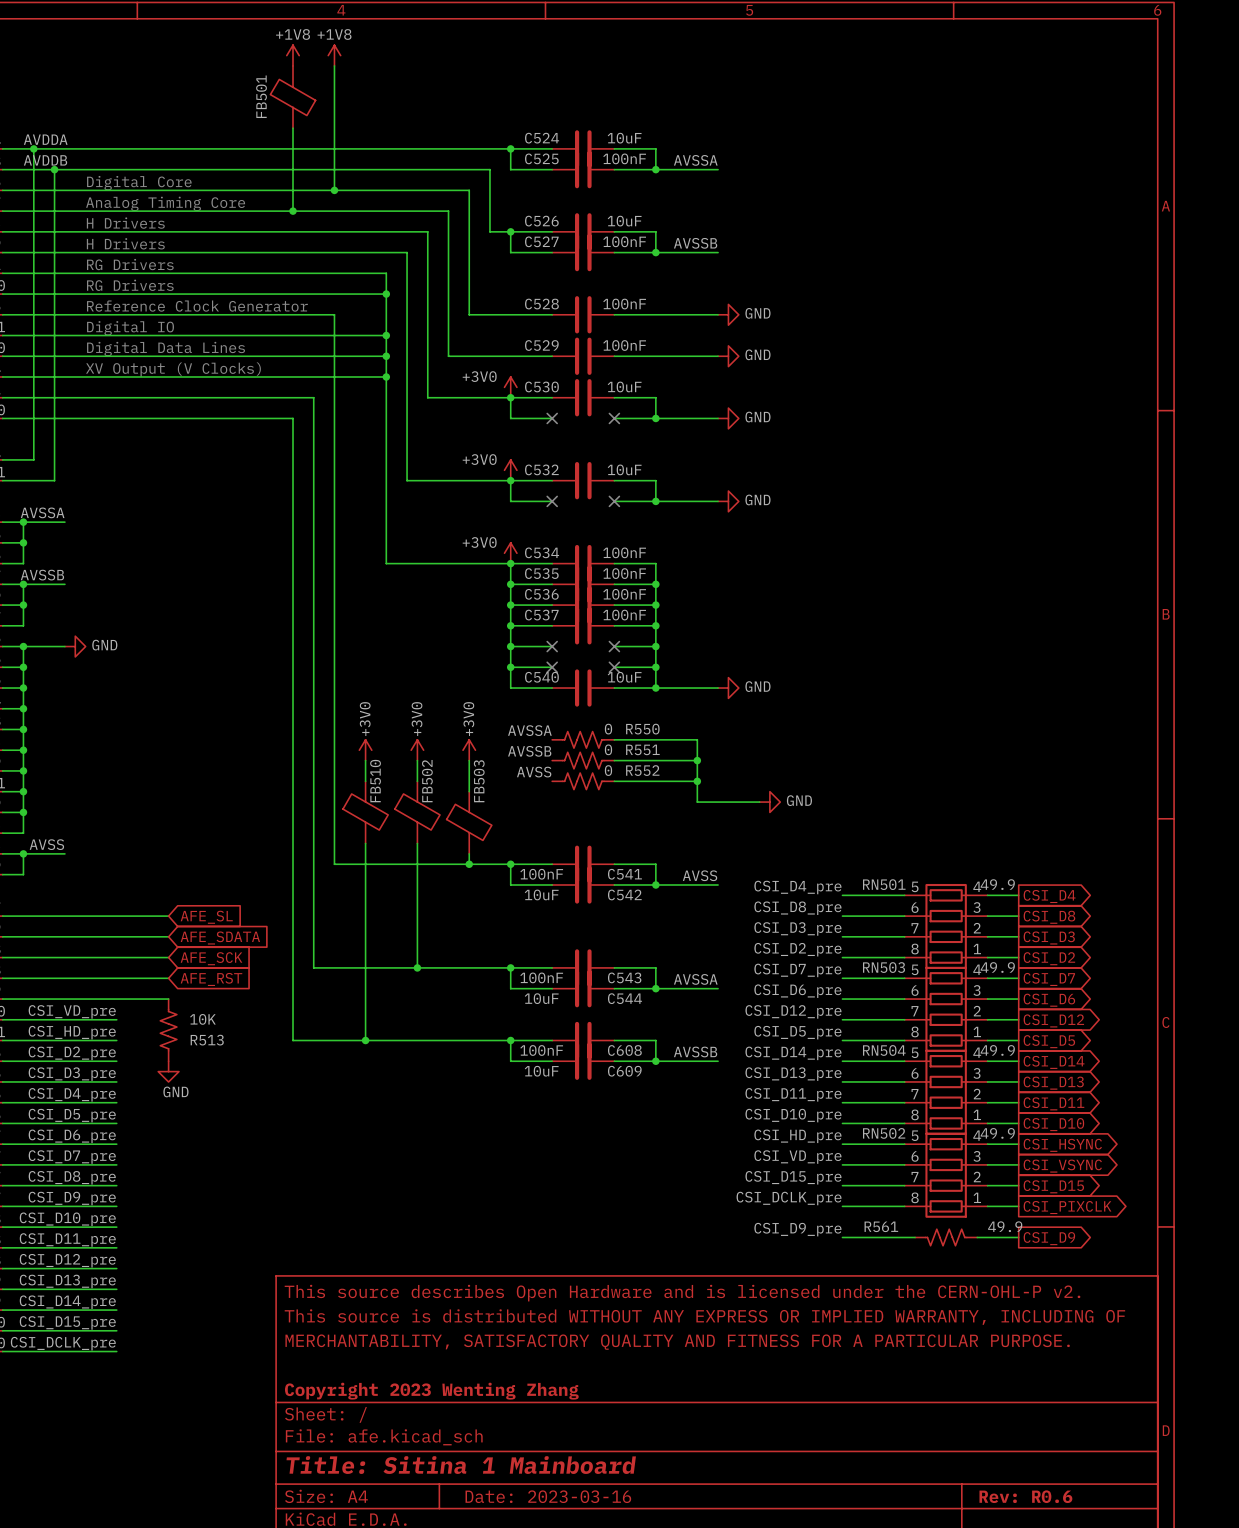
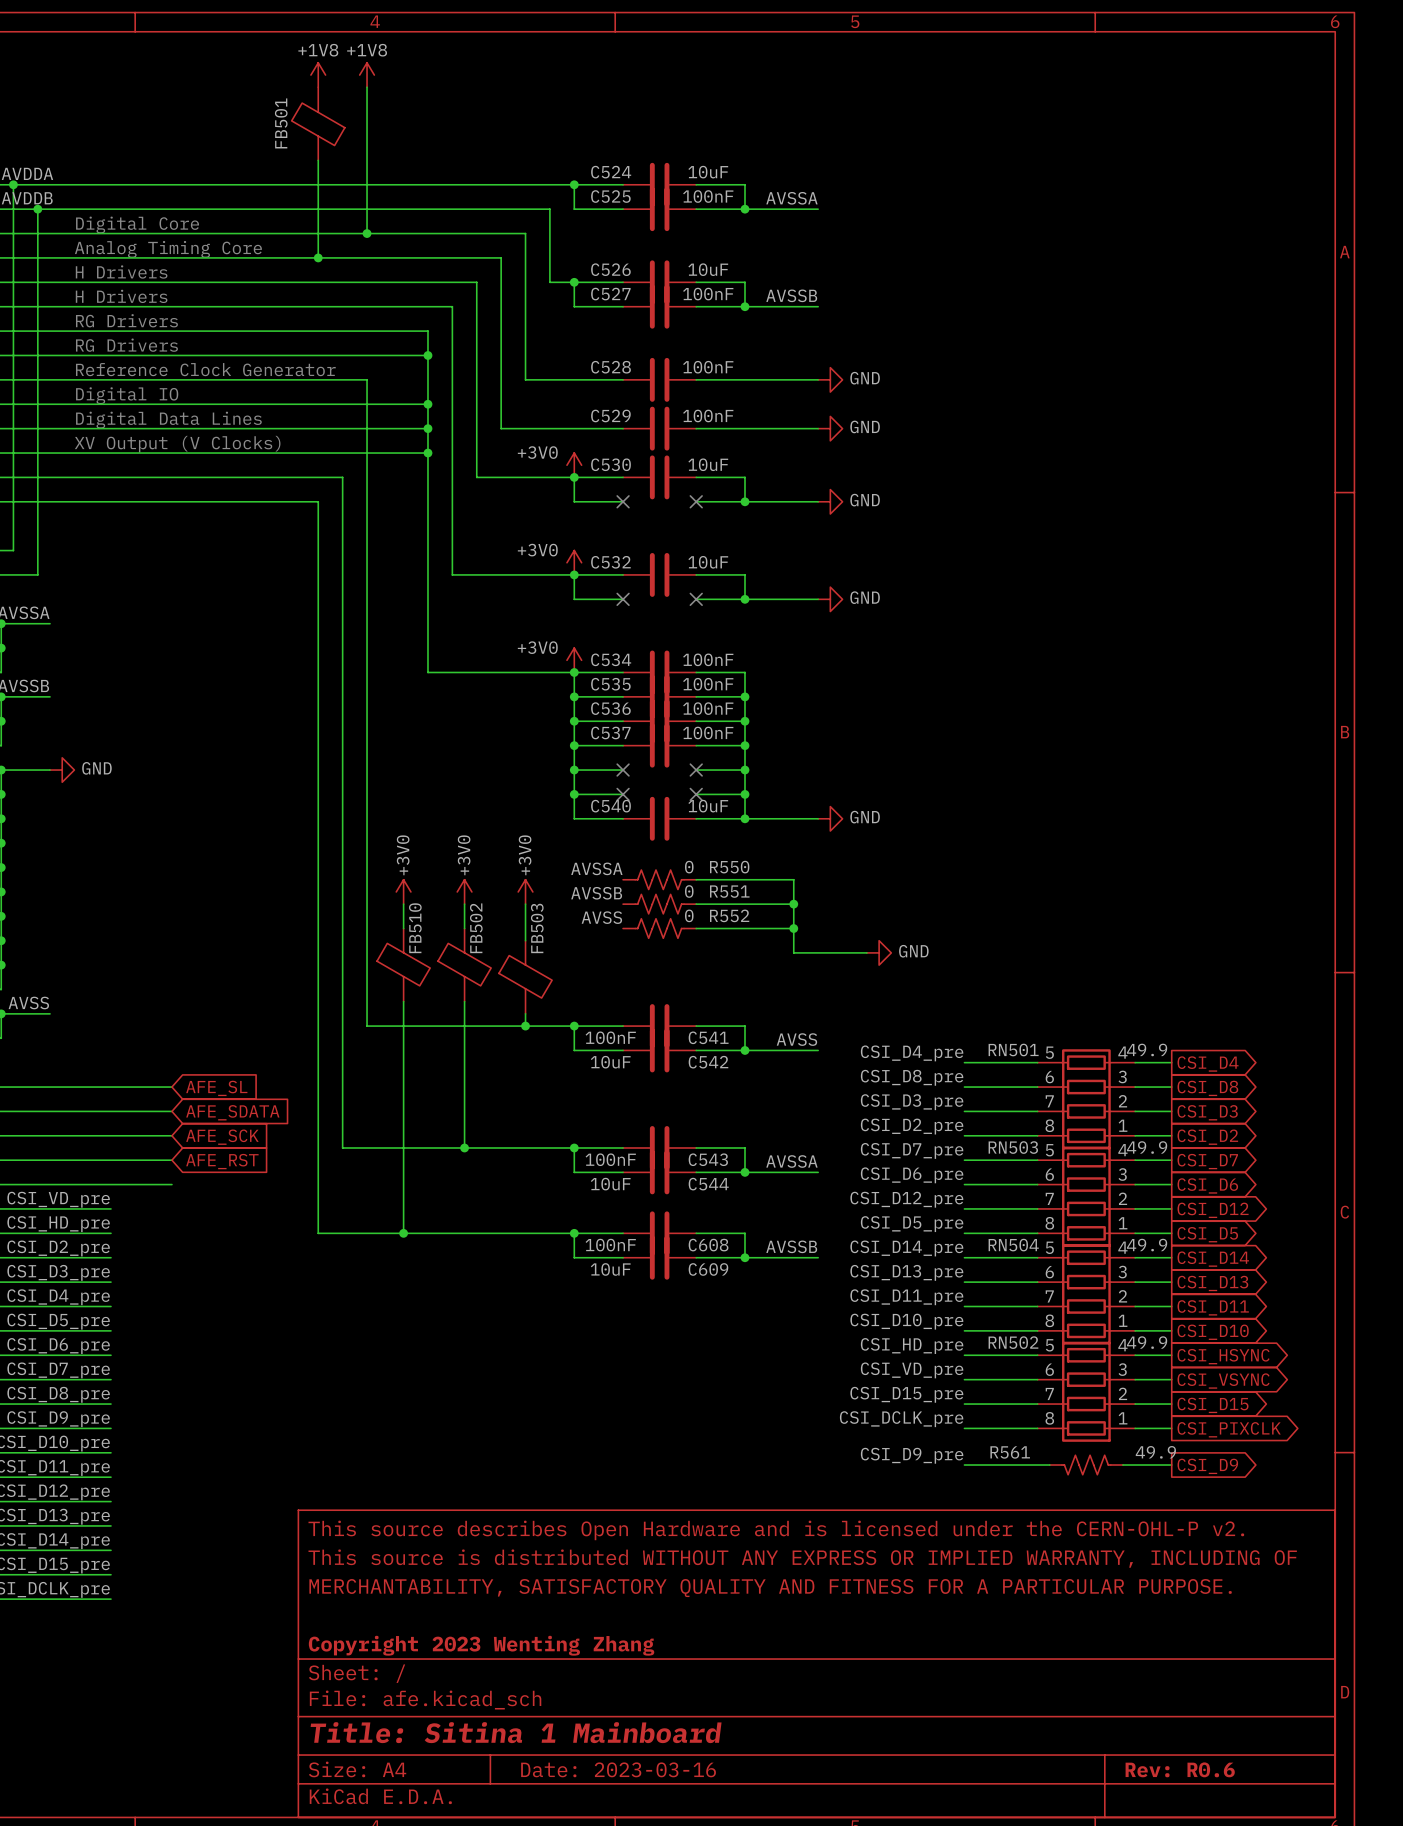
R513: 10K (168, 1030) -> none
power symbol: GND (168, 1071) -> none

